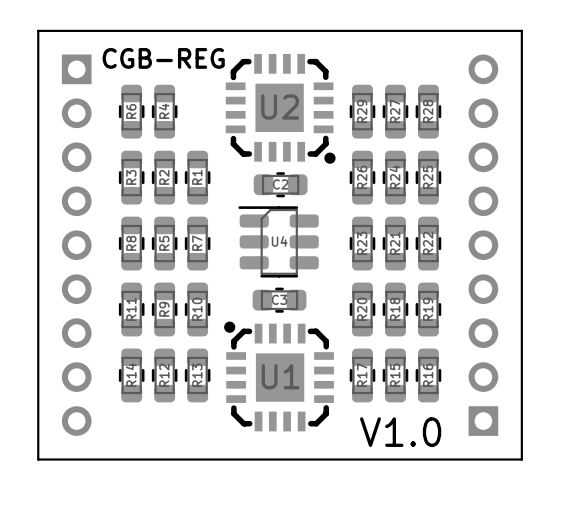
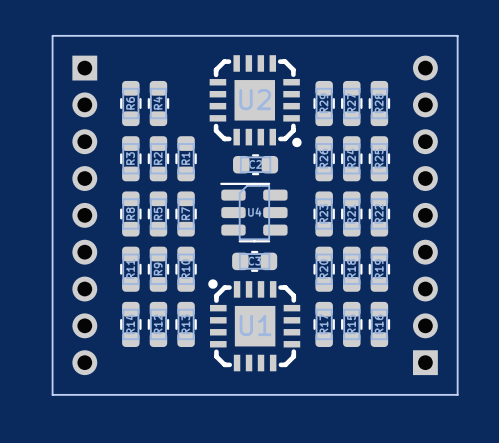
text: CGB-REG (163, 58) -> none
text: V1.0 (400, 432) -> none

